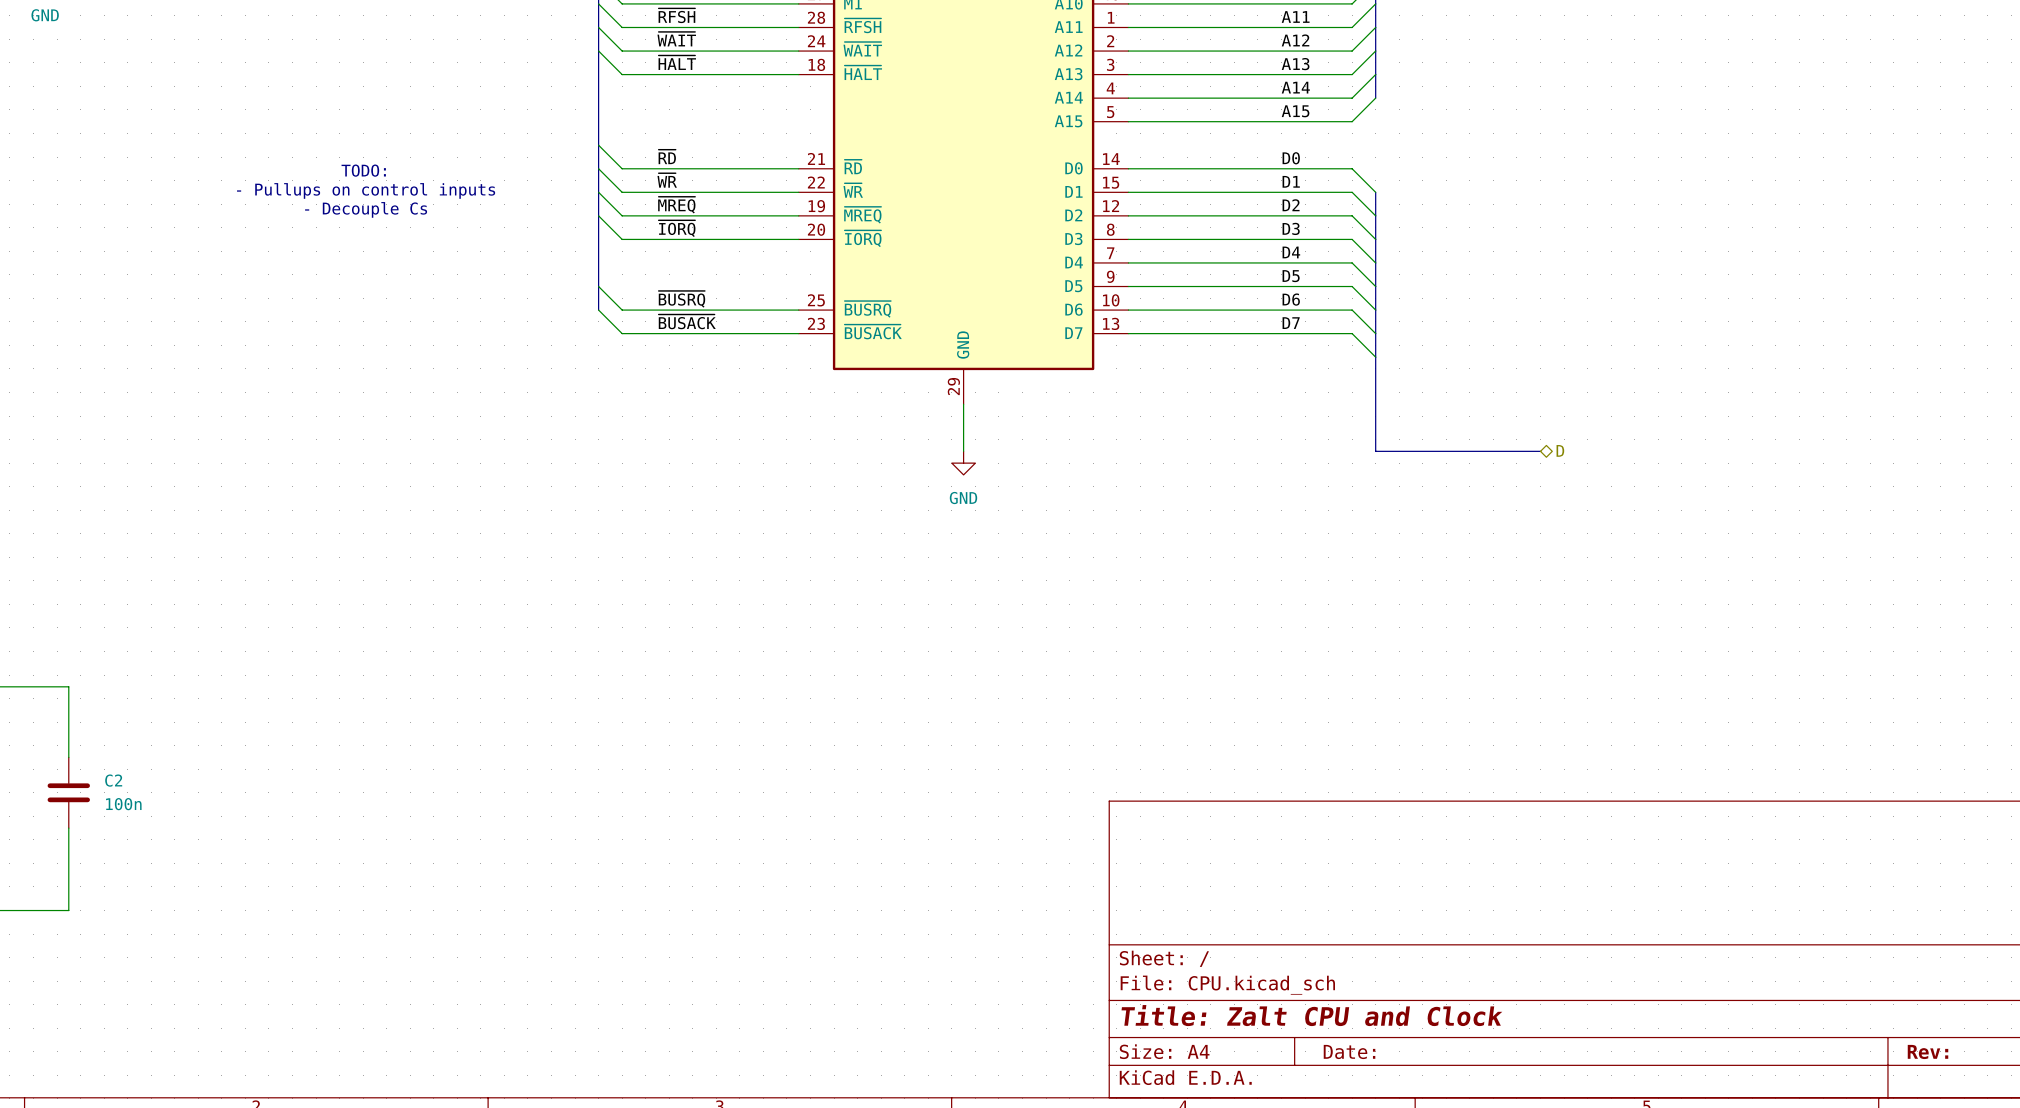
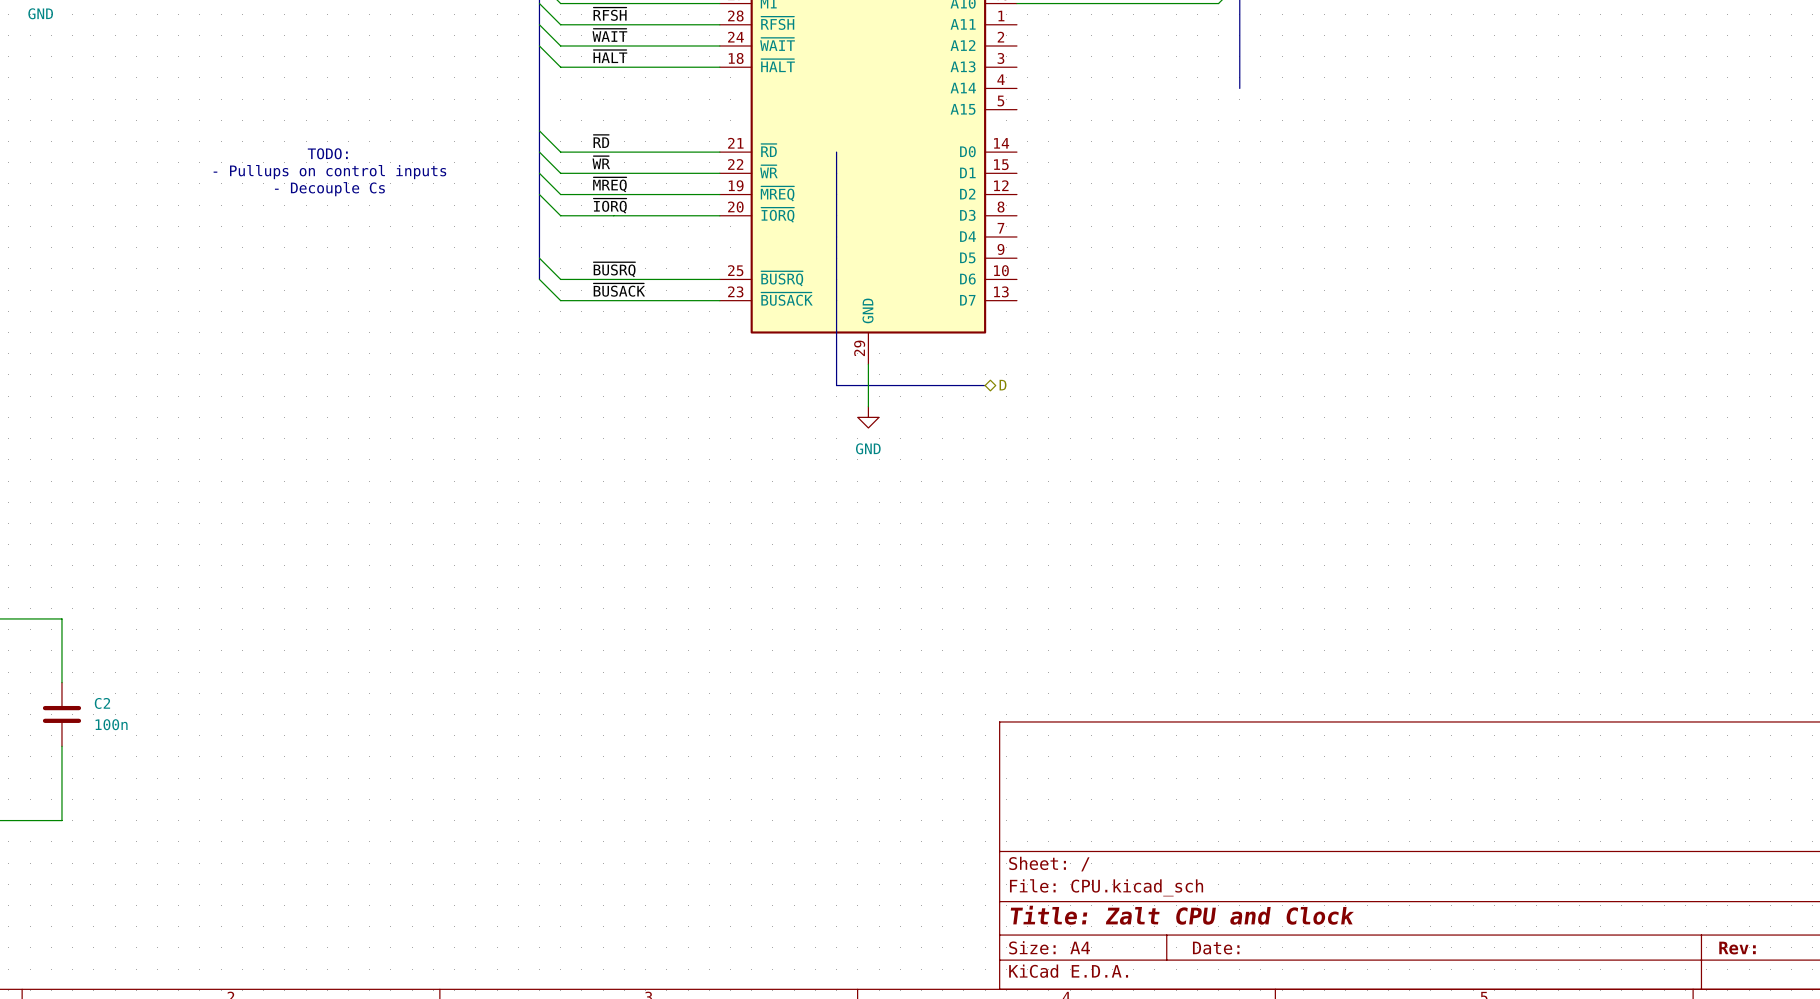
wire: (1375, 3) (1352, 27) (1128, 27) -> none
label: A11 (1295, 16) -> none
wire: (1375, 27) (1352, 51) (1128, 51) -> none
label: A12 (1295, 40) -> none
wire: (1375, 51) (1352, 74) (1128, 74) -> none
label: A13 (1295, 64) -> none
wire: (1375, 74) (1352, 98) (1128, 98) -> none
label: A14 (1295, 87) -> none
wire: (1375, 98) (1352, 121) (1128, 121) -> none
label: A15 (1295, 111) -> none
label: D0 (1291, 158) -> none
bus: none -> (836, 152) (836, 385) (985, 385)
wire: (1128, 168) (1352, 168) (1375, 192) -> none
label: D1 (1291, 181) -> none
wire: (1128, 192) (1352, 192) (1375, 215) -> none
bus: (1375, 192) (1375, 451) (1540, 451) -> none
label: D2 (1291, 205) -> none
wire: (1128, 215) (1352, 215) (1375, 239) -> none
label: D3 (1291, 228) -> none
wire: (1128, 239) (1352, 239) (1375, 262) -> none
label: D4 (1291, 252) -> none
wire: (1128, 262) (1352, 262) (1375, 286) -> none
label: D5 (1291, 276) -> none
wire: (1128, 286) (1352, 286) (1375, 310) -> none
label: D6 (1291, 299) -> none
wire: (1128, 310) (1352, 310) (1375, 333) -> none
label: D7 (1291, 323) -> none
wire: (1128, 333) (1352, 333) (1375, 357) -> none
hierarchical label: none -> D (1003, 385)
hierarchical label: D (1560, 450) -> none

